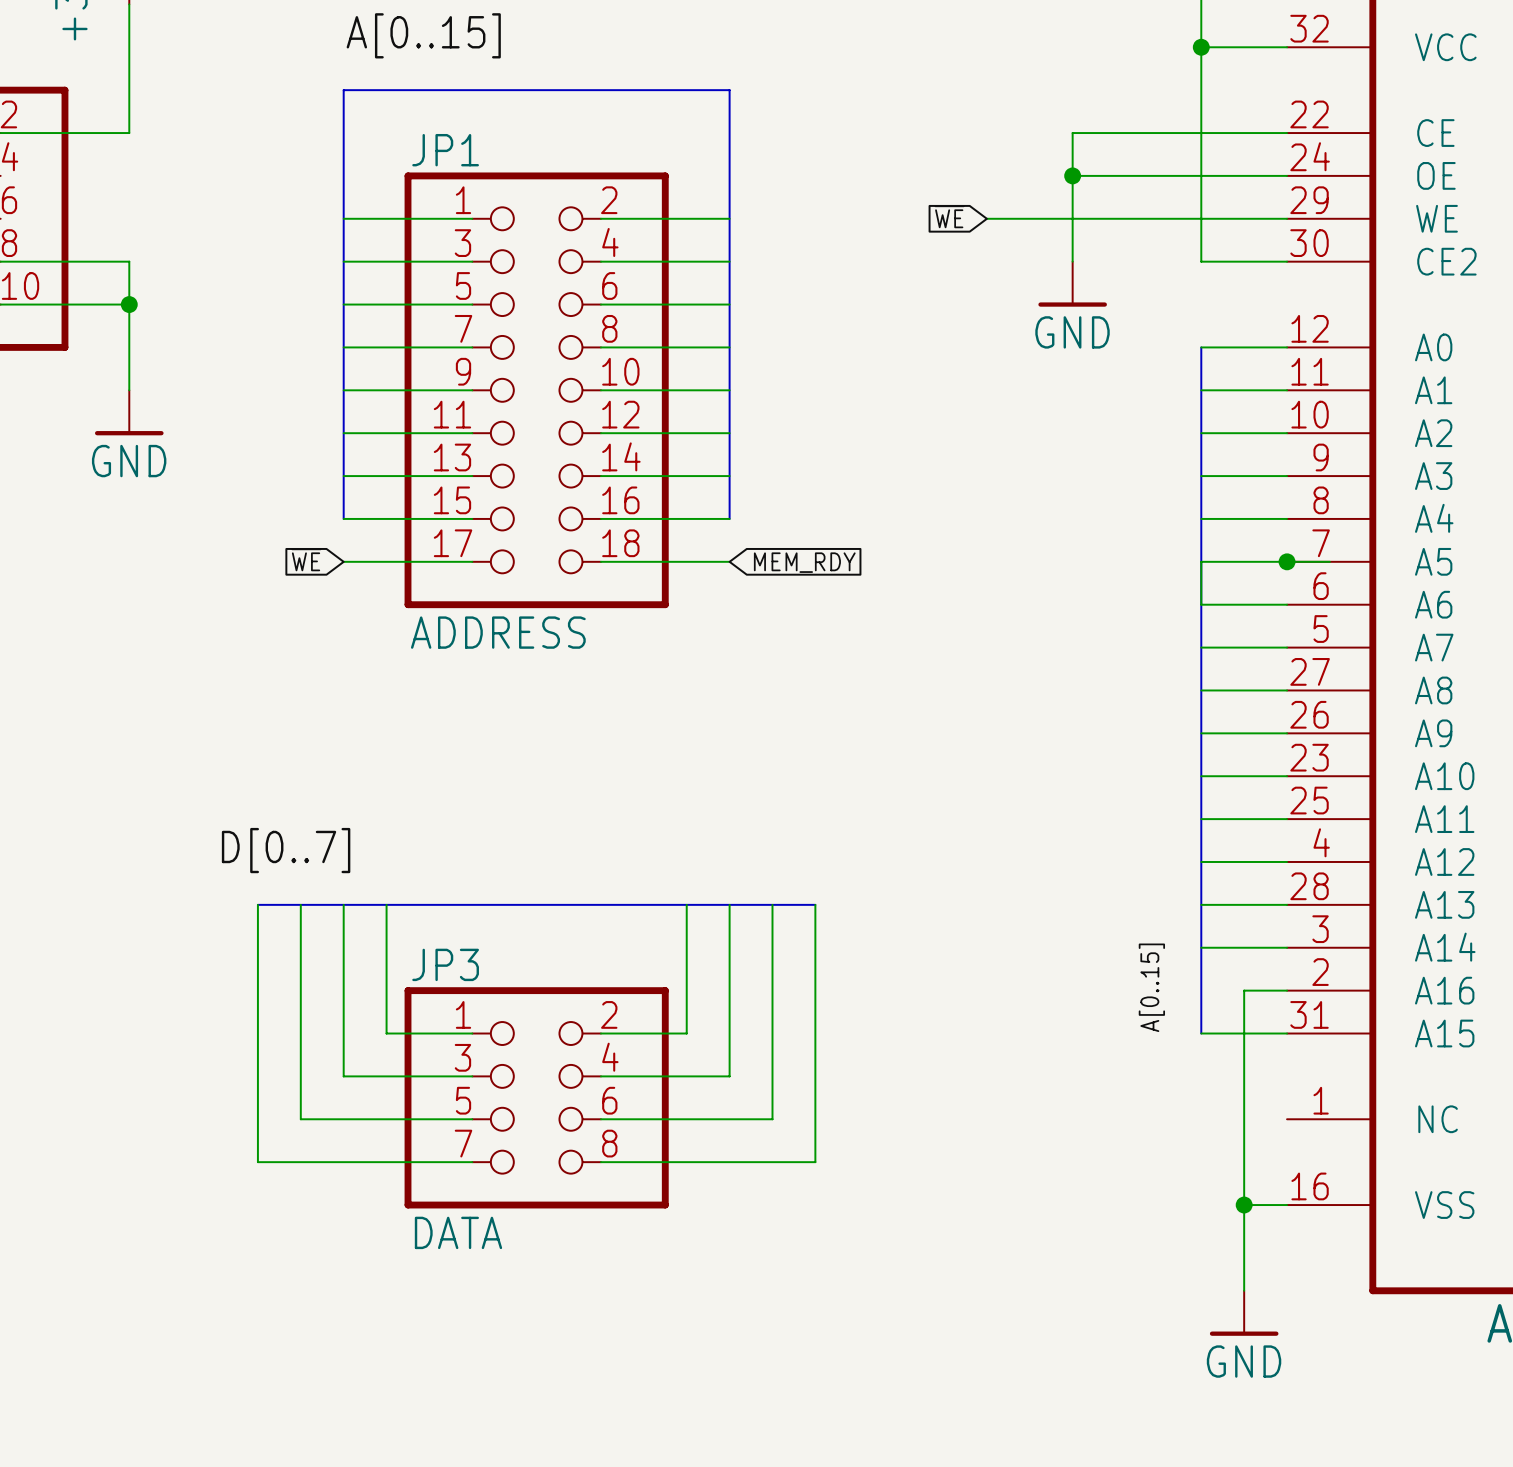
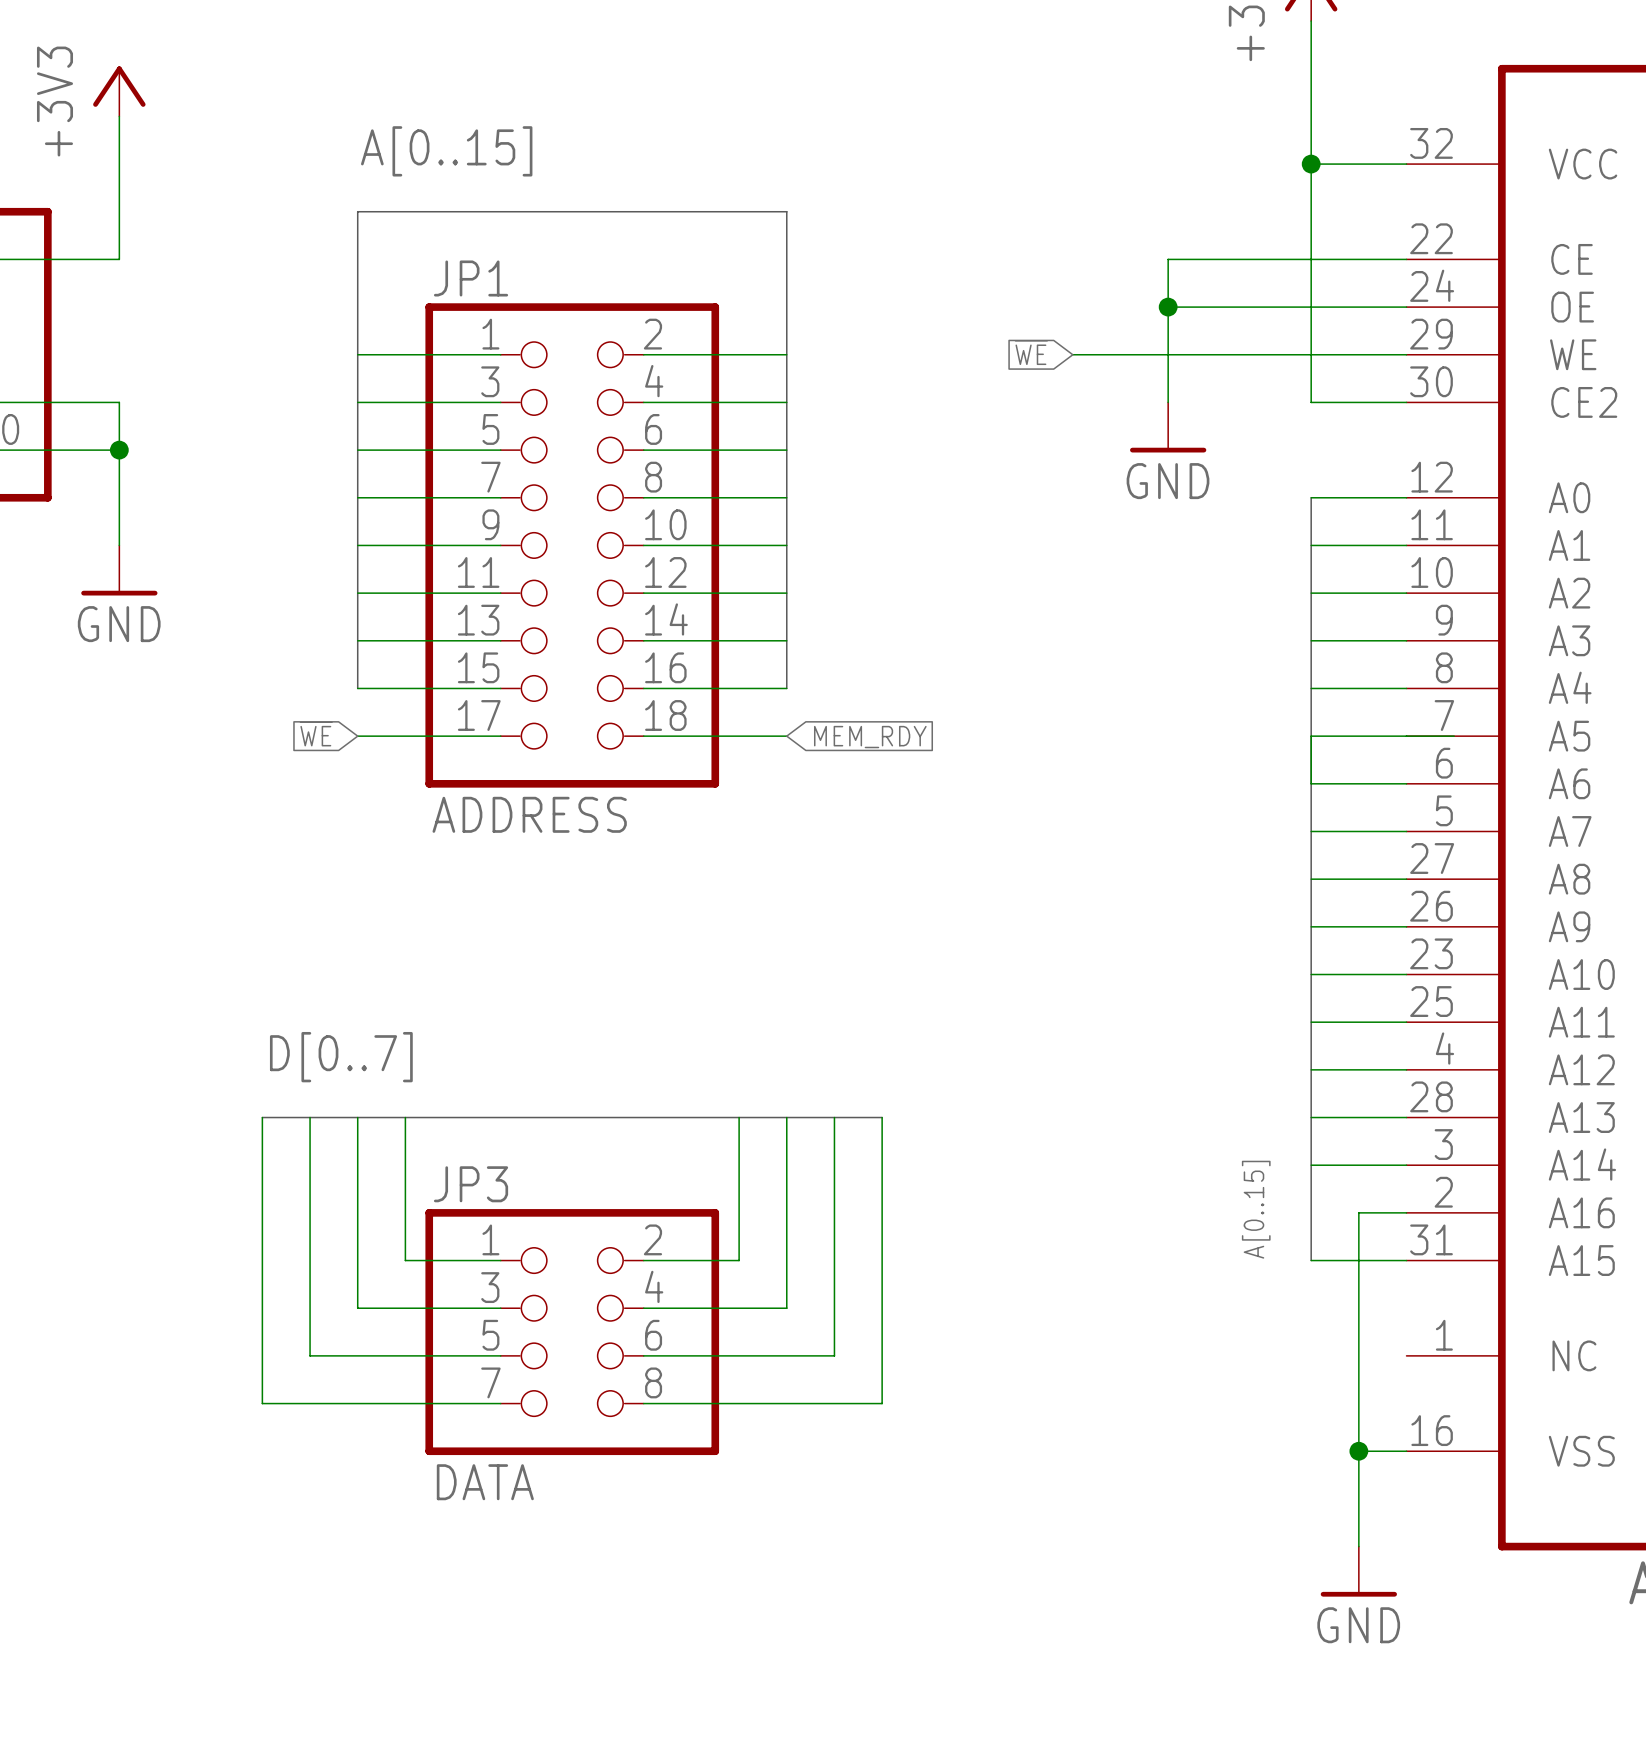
junction: (1287, 561) -> none
label position: D[0..7] (286, 850) -> D[0..7] (341, 1057)

